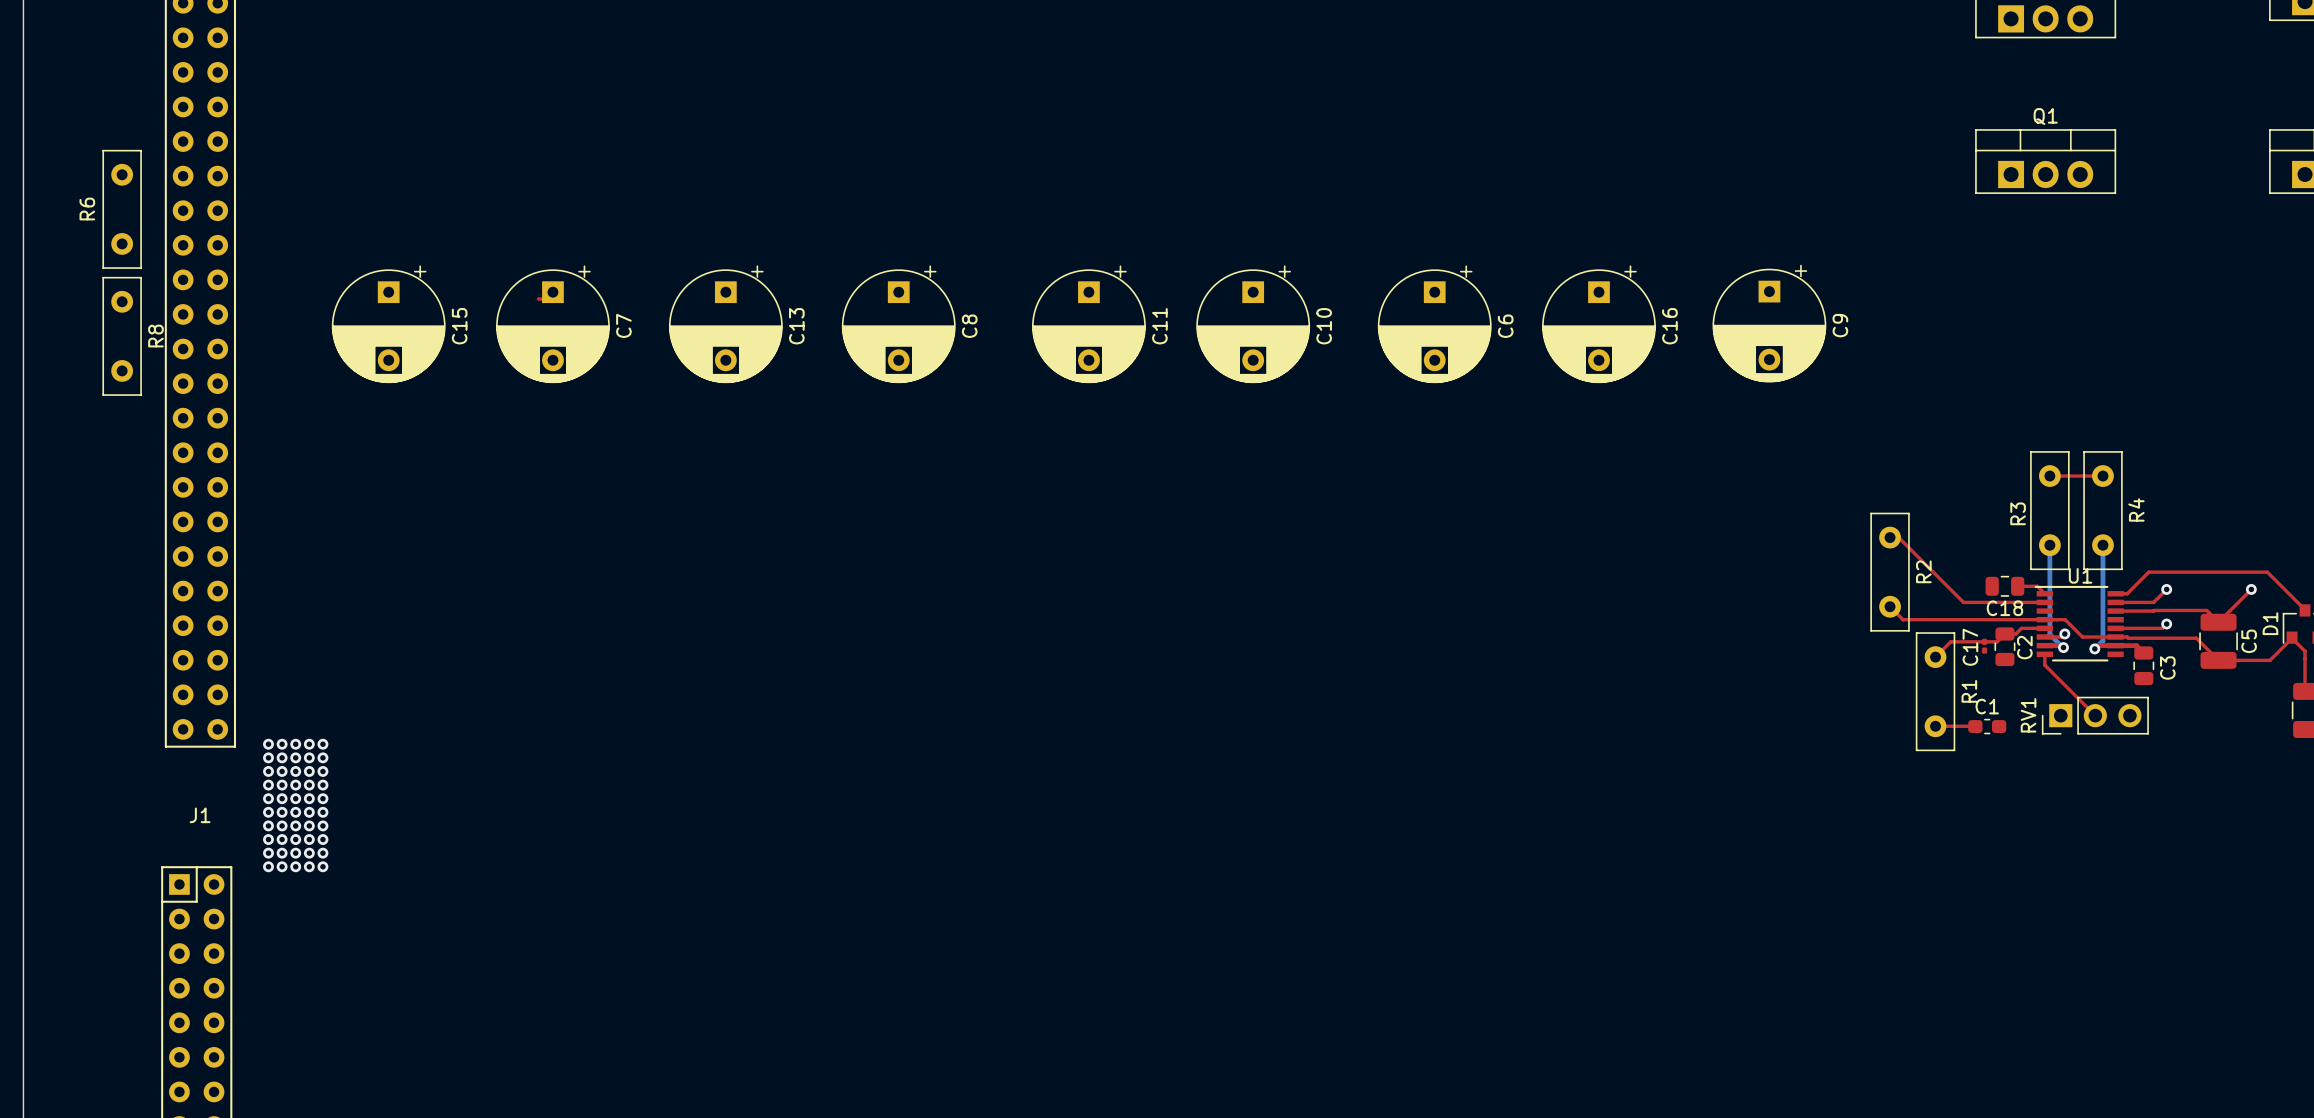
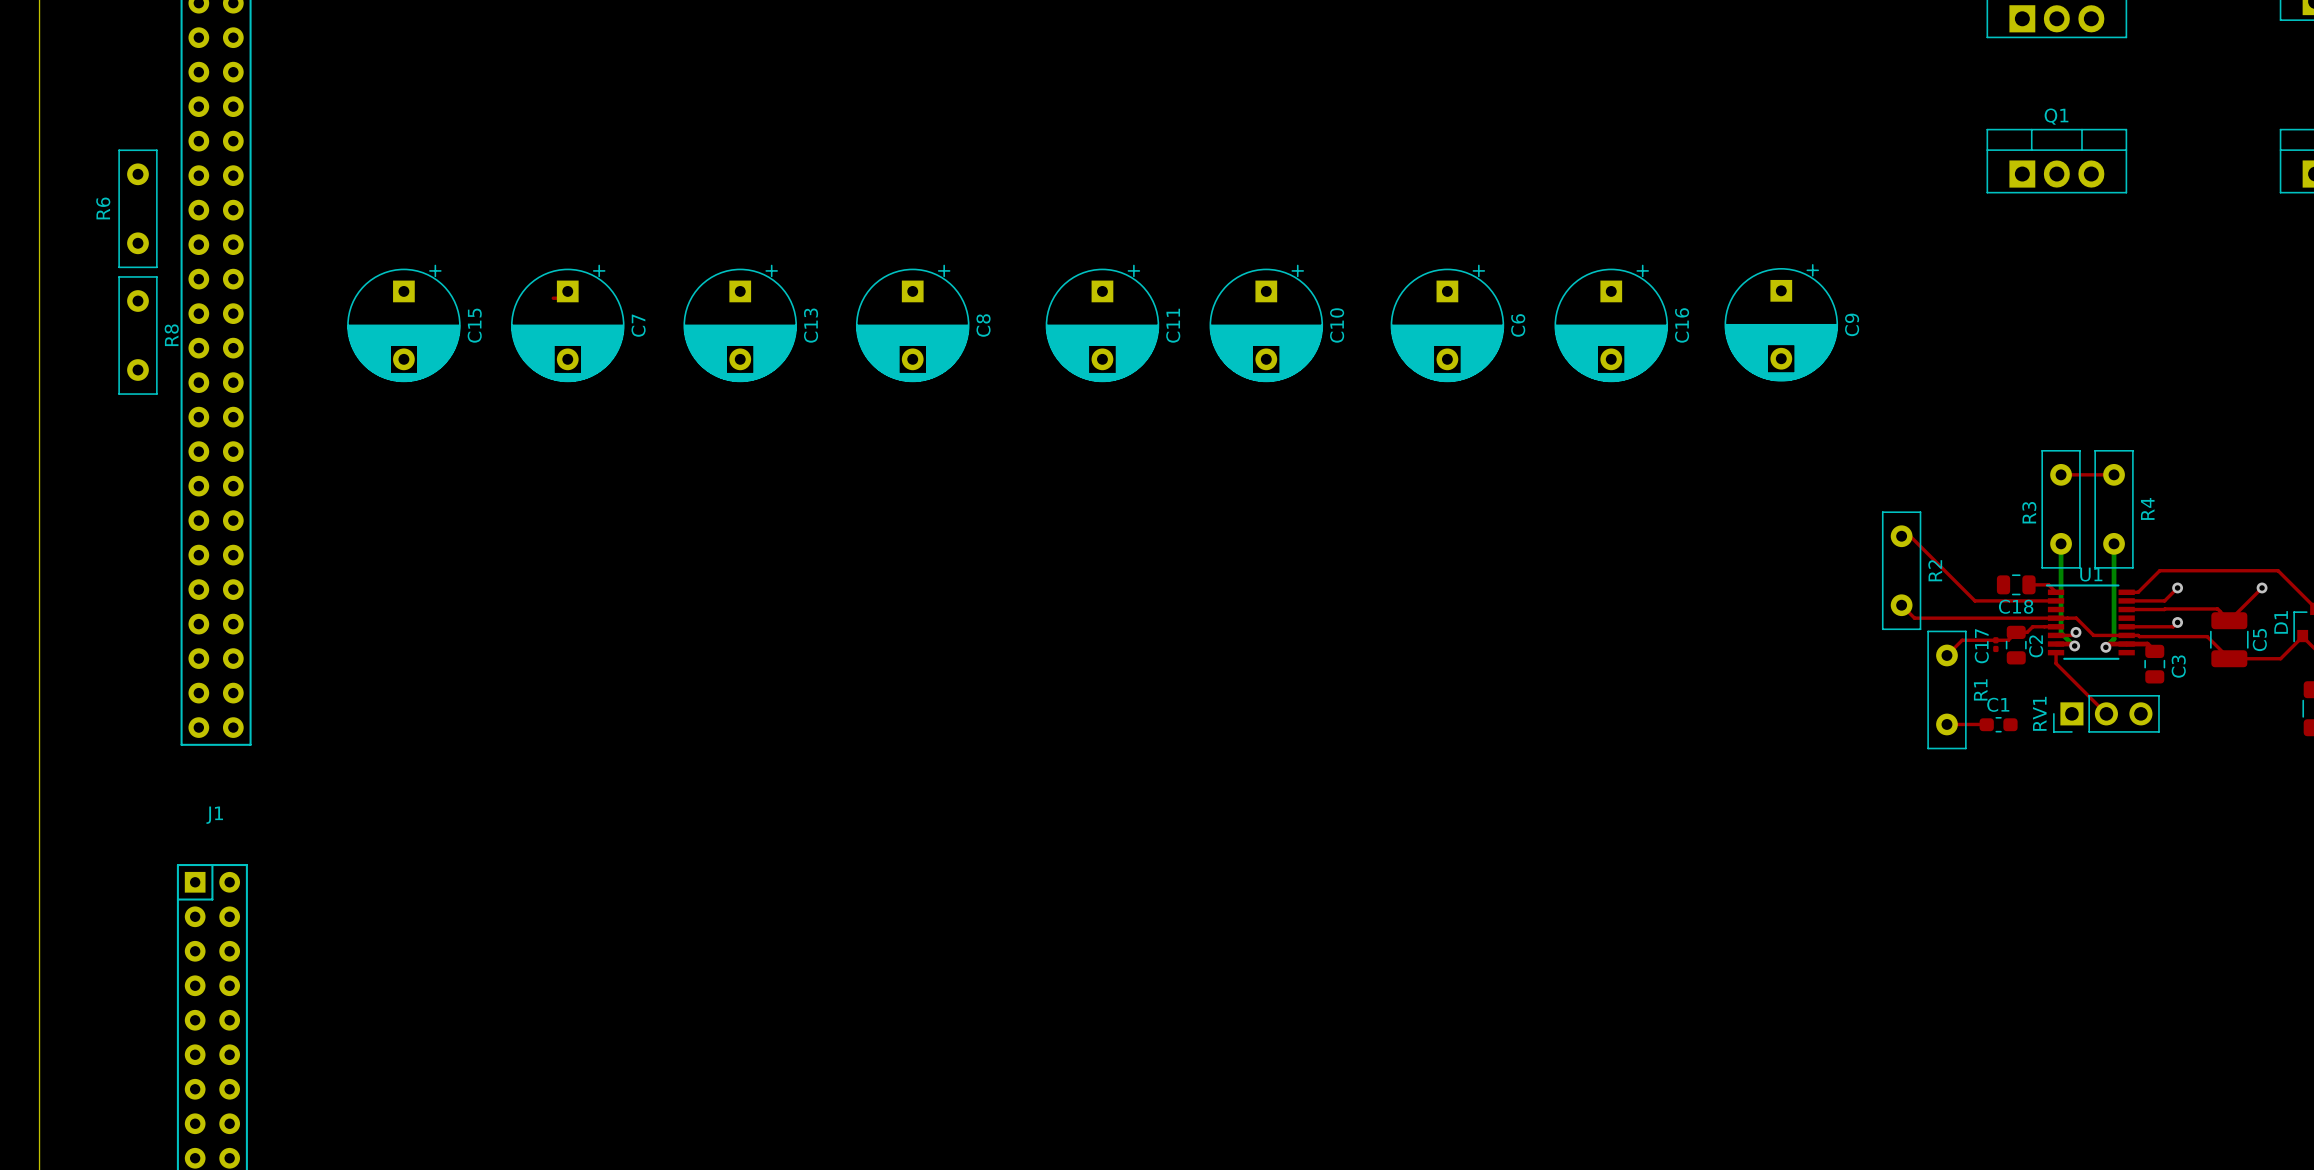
via: (268, 744) -> none
via: (282, 744) -> none
via: (295, 744) -> none
via: (309, 744) -> none
via: (322, 744) -> none
via: (268, 757) -> none
via: (282, 757) -> none
via: (295, 757) -> none
via: (309, 757) -> none
via: (322, 757) -> none
via: (268, 771) -> none
via: (282, 771) -> none
via: (295, 771) -> none
via: (309, 771) -> none
via: (322, 771) -> none
via: (268, 785) -> none
via: (282, 785) -> none
via: (295, 785) -> none
via: (309, 785) -> none
via: (322, 785) -> none
via: (268, 798) -> none
via: (282, 798) -> none
via: (295, 798) -> none
via: (309, 798) -> none
via: (322, 798) -> none
via: (268, 812) -> none
via: (282, 812) -> none
via: (295, 812) -> none
via: (309, 812) -> none
via: (322, 812) -> none
via: (268, 825) -> none
via: (282, 825) -> none
via: (295, 825) -> none
via: (309, 825) -> none
via: (322, 825) -> none
via: (268, 839) -> none
via: (282, 839) -> none
via: (295, 839) -> none
via: (309, 839) -> none
via: (322, 839) -> none
via: (268, 853) -> none
via: (282, 853) -> none
via: (295, 853) -> none
via: (309, 853) -> none
via: (322, 853) -> none
via: (268, 866) -> none
via: (282, 866) -> none
via: (295, 866) -> none
via: (309, 866) -> none
via: (322, 866) -> none

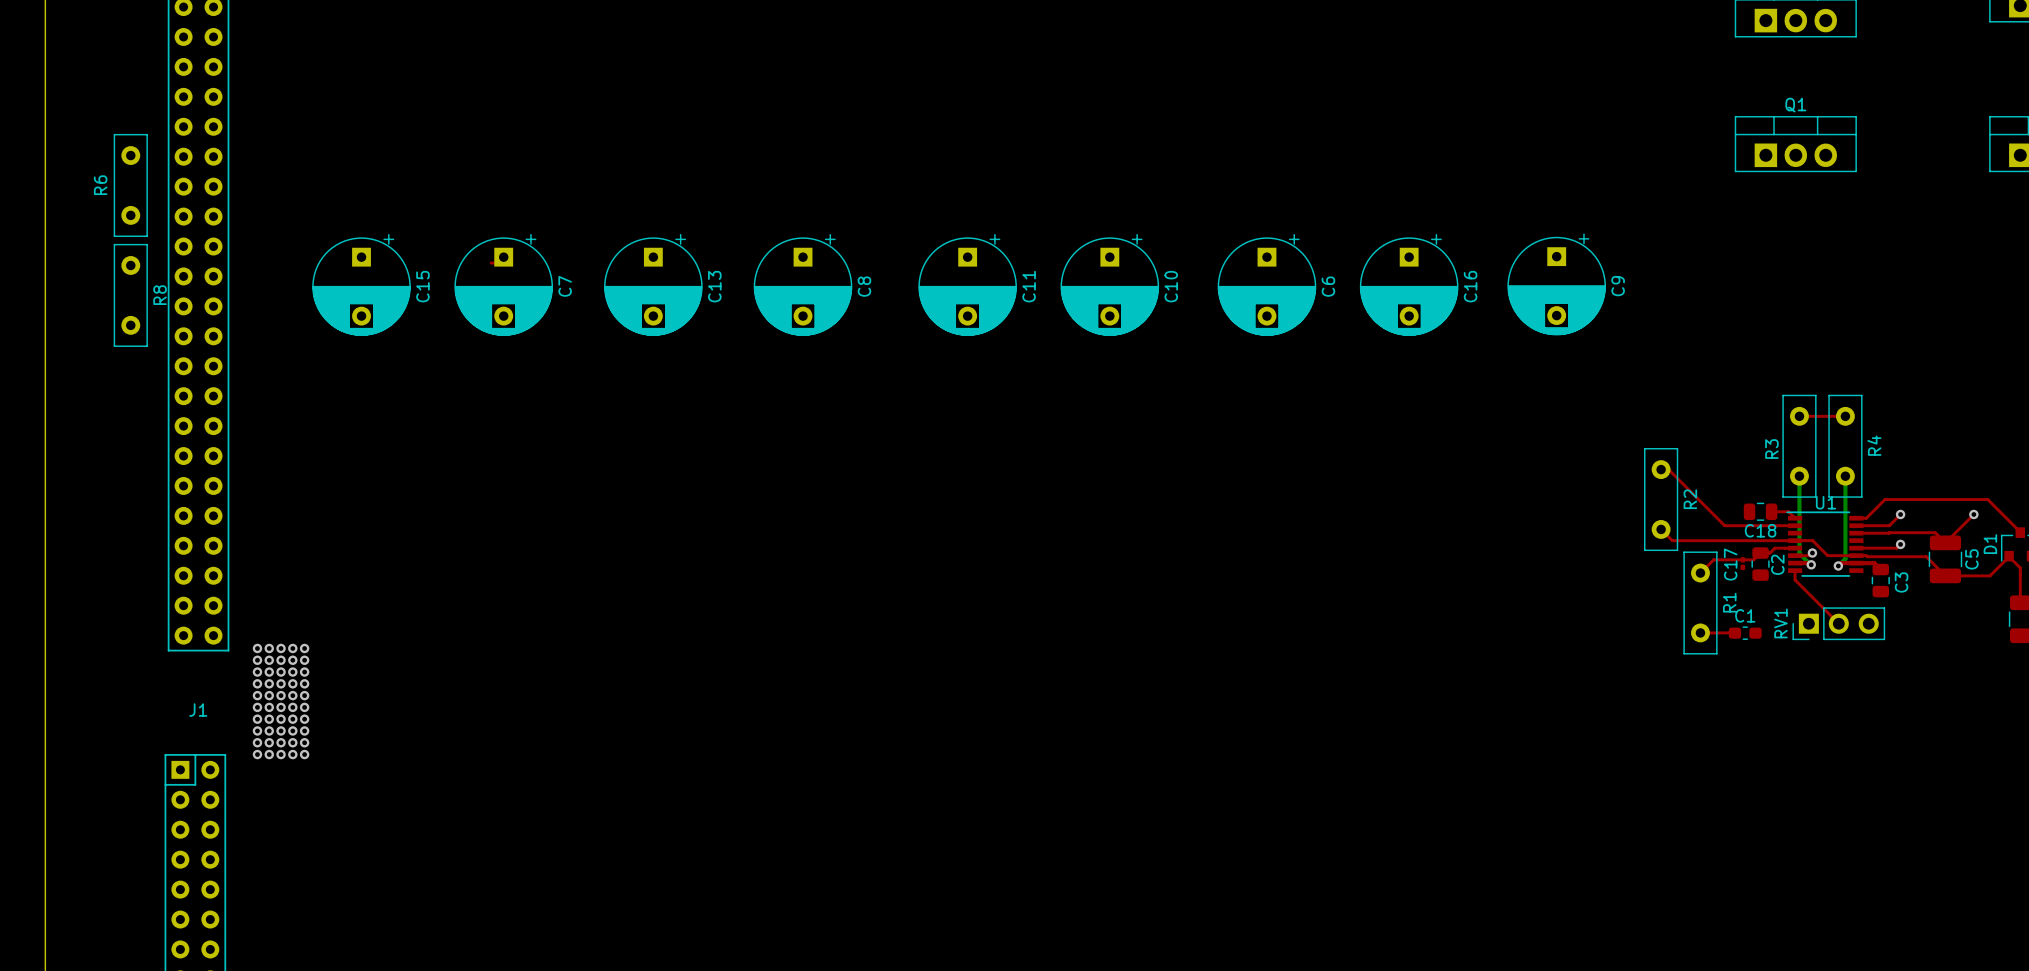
via: none -> (257, 648)
via: none -> (269, 648)
via: none -> (281, 648)
via: none -> (292, 648)
via: none -> (304, 648)
via: none -> (257, 660)
via: none -> (269, 660)
via: none -> (281, 660)
via: none -> (292, 660)
via: none -> (304, 660)
via: none -> (257, 672)
via: none -> (269, 672)
via: none -> (281, 672)
via: none -> (292, 672)
via: none -> (304, 672)
via: none -> (257, 683)
via: none -> (269, 683)
via: none -> (281, 683)
via: none -> (292, 683)
via: none -> (304, 683)
via: none -> (257, 695)
via: none -> (269, 695)
via: none -> (281, 695)
via: none -> (292, 695)
via: none -> (304, 695)
via: none -> (257, 707)
via: none -> (269, 707)
via: none -> (281, 707)
via: none -> (292, 707)
via: none -> (304, 707)
via: none -> (257, 719)
via: none -> (269, 719)
via: none -> (281, 719)
via: none -> (292, 719)
via: none -> (304, 719)
via: none -> (257, 730)
via: none -> (269, 730)
via: none -> (281, 730)
via: none -> (292, 730)
via: none -> (304, 730)
via: none -> (257, 742)
via: none -> (269, 742)
via: none -> (281, 742)
via: none -> (292, 742)
via: none -> (304, 742)
via: none -> (257, 754)
via: none -> (269, 754)
via: none -> (281, 754)
via: none -> (292, 754)
via: none -> (304, 754)

